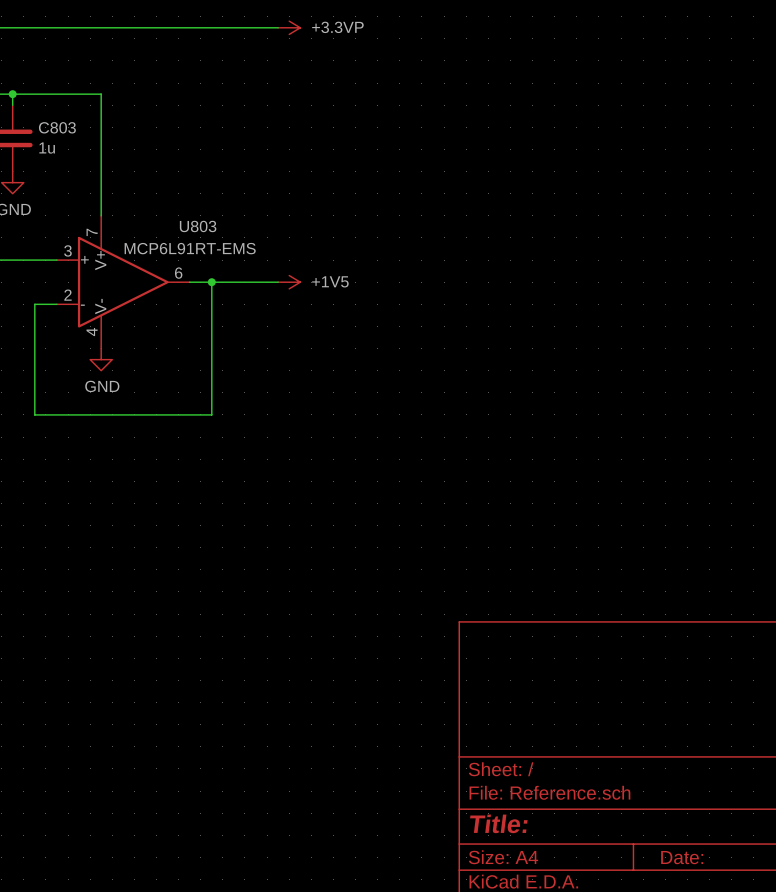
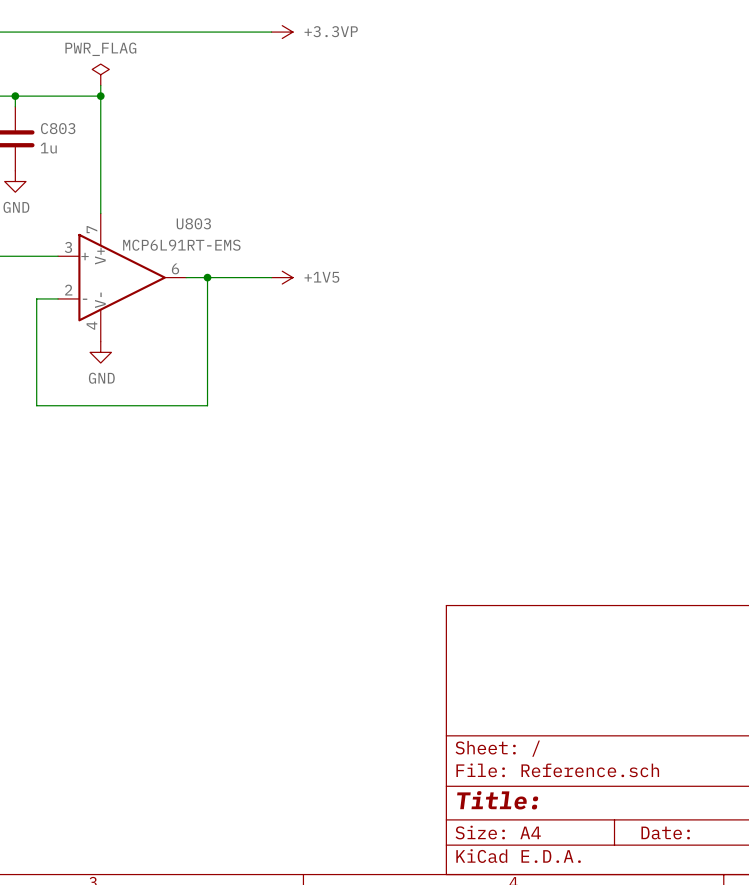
power symbol: none -> PWR_FLAG (100, 74)
wire: none -> (100, 85) (100, 96)
junction: none -> (100, 96)

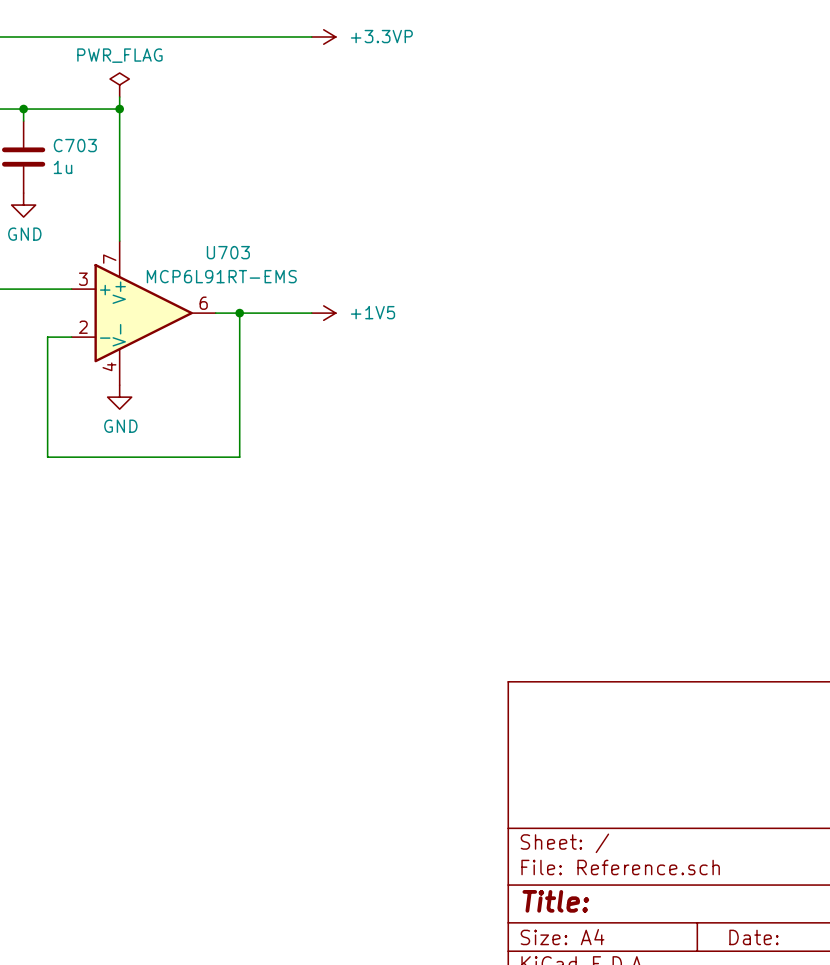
C803 name: C803 (58, 128) -> C703 (75, 145)
U803 name: U803 (193, 223) -> U703 (228, 252)

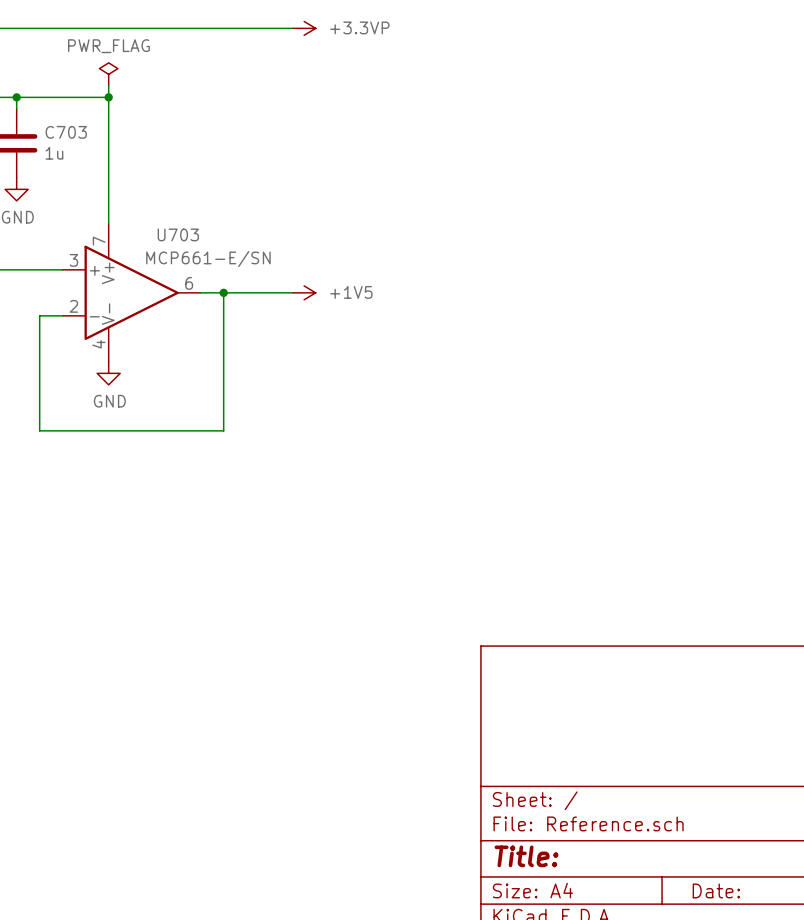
U703 name position: U703 (228, 252) -> U703 (178, 234)
U703 value: MCP6L91RT-EMS (221, 276) -> MCP661-E/SN (208, 259)

